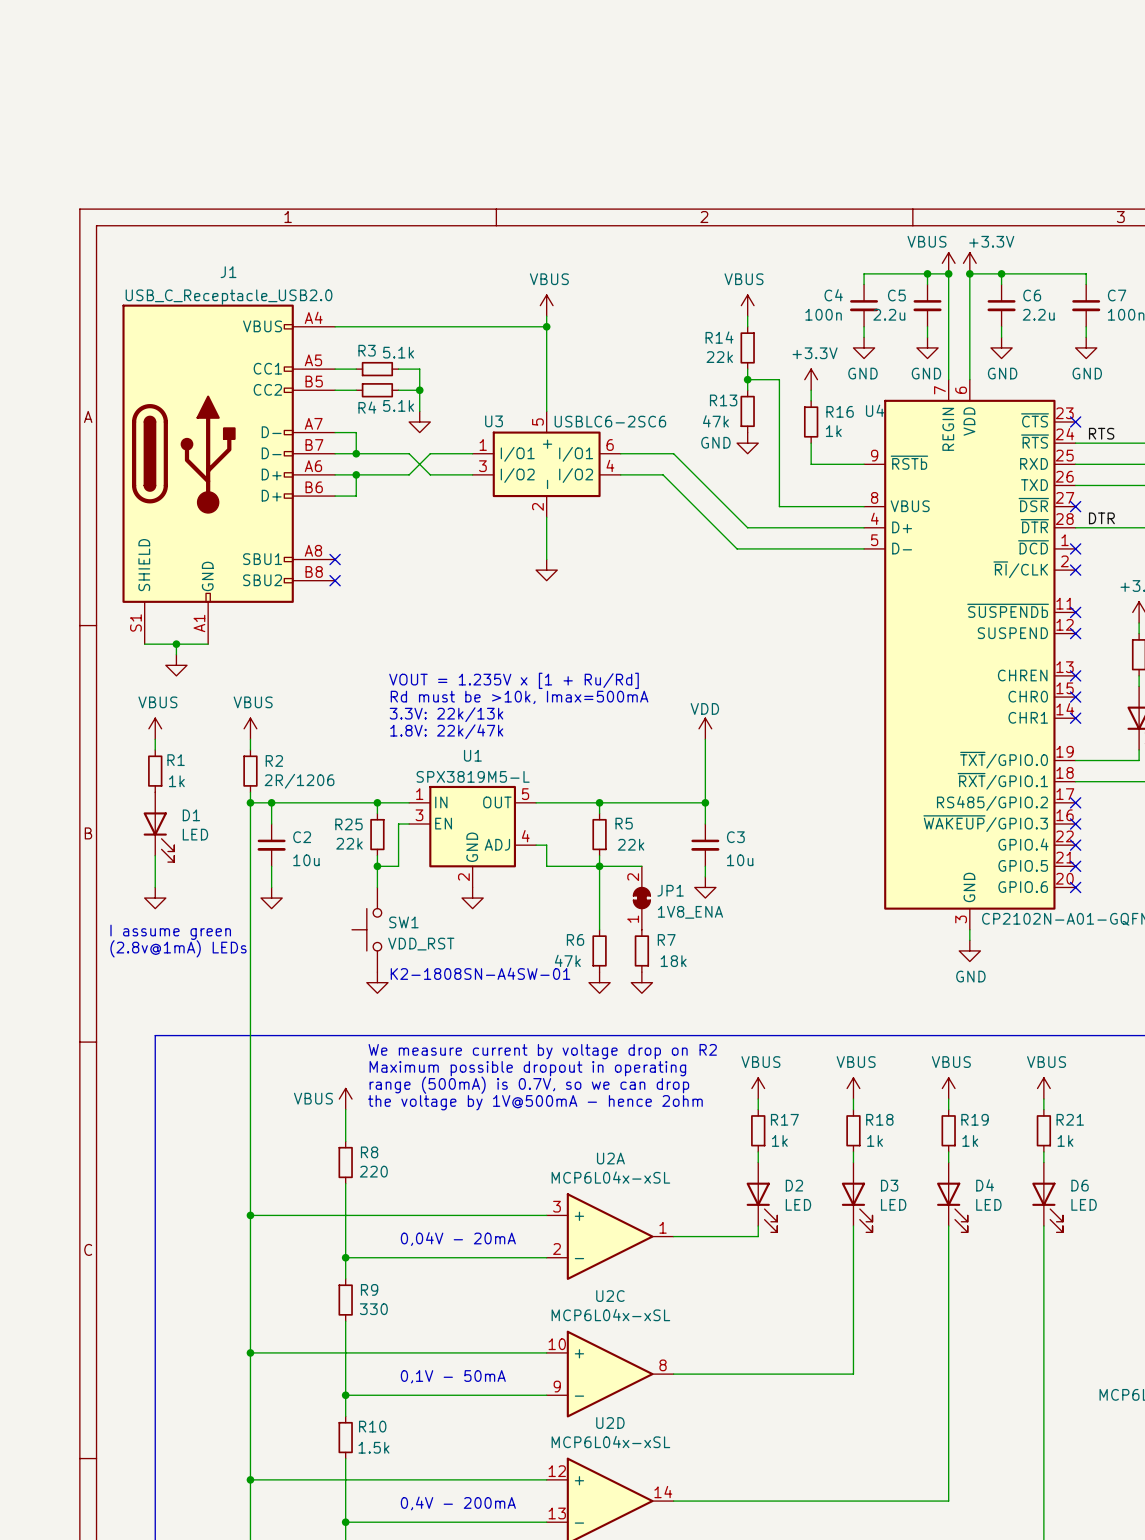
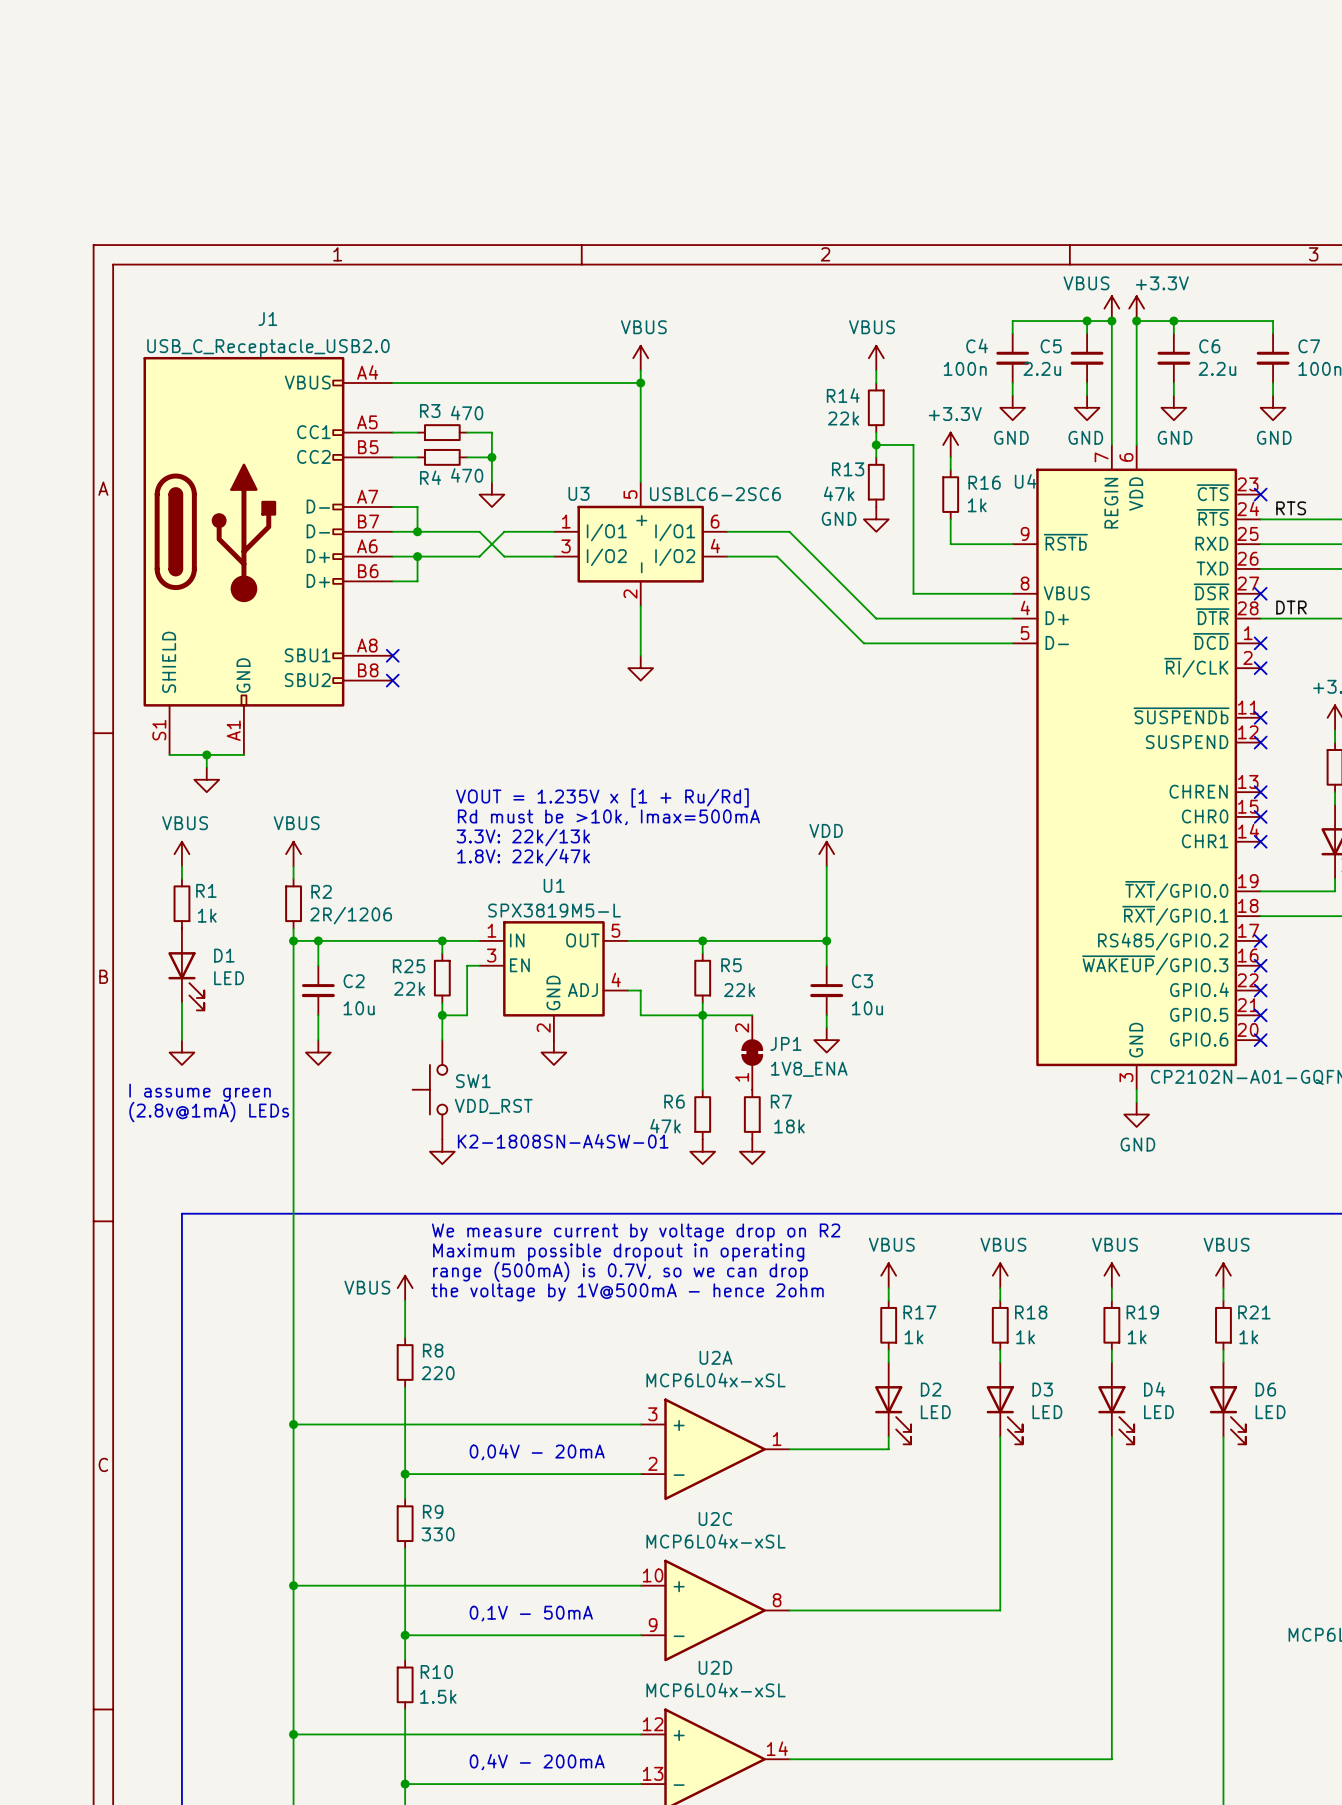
R3 value: 5.1k (398, 352) -> 470 (467, 413)
R4 value: 5.1k (398, 405) -> 470 (467, 475)

